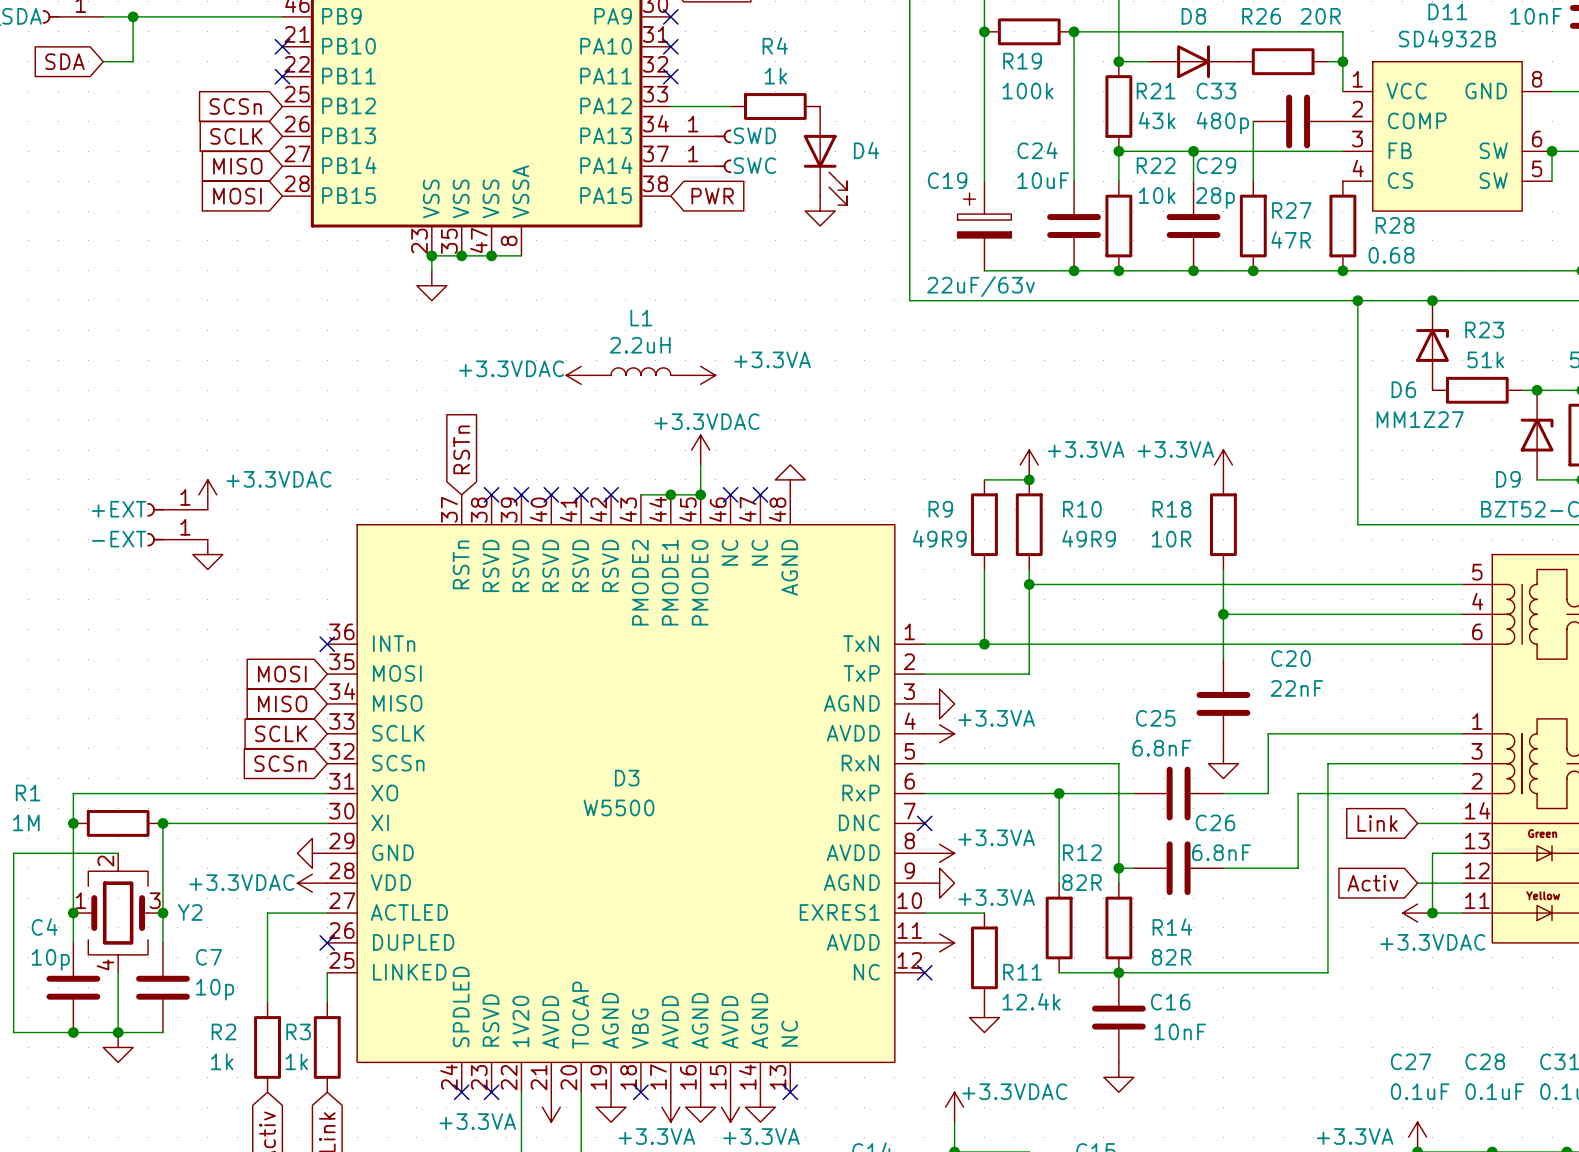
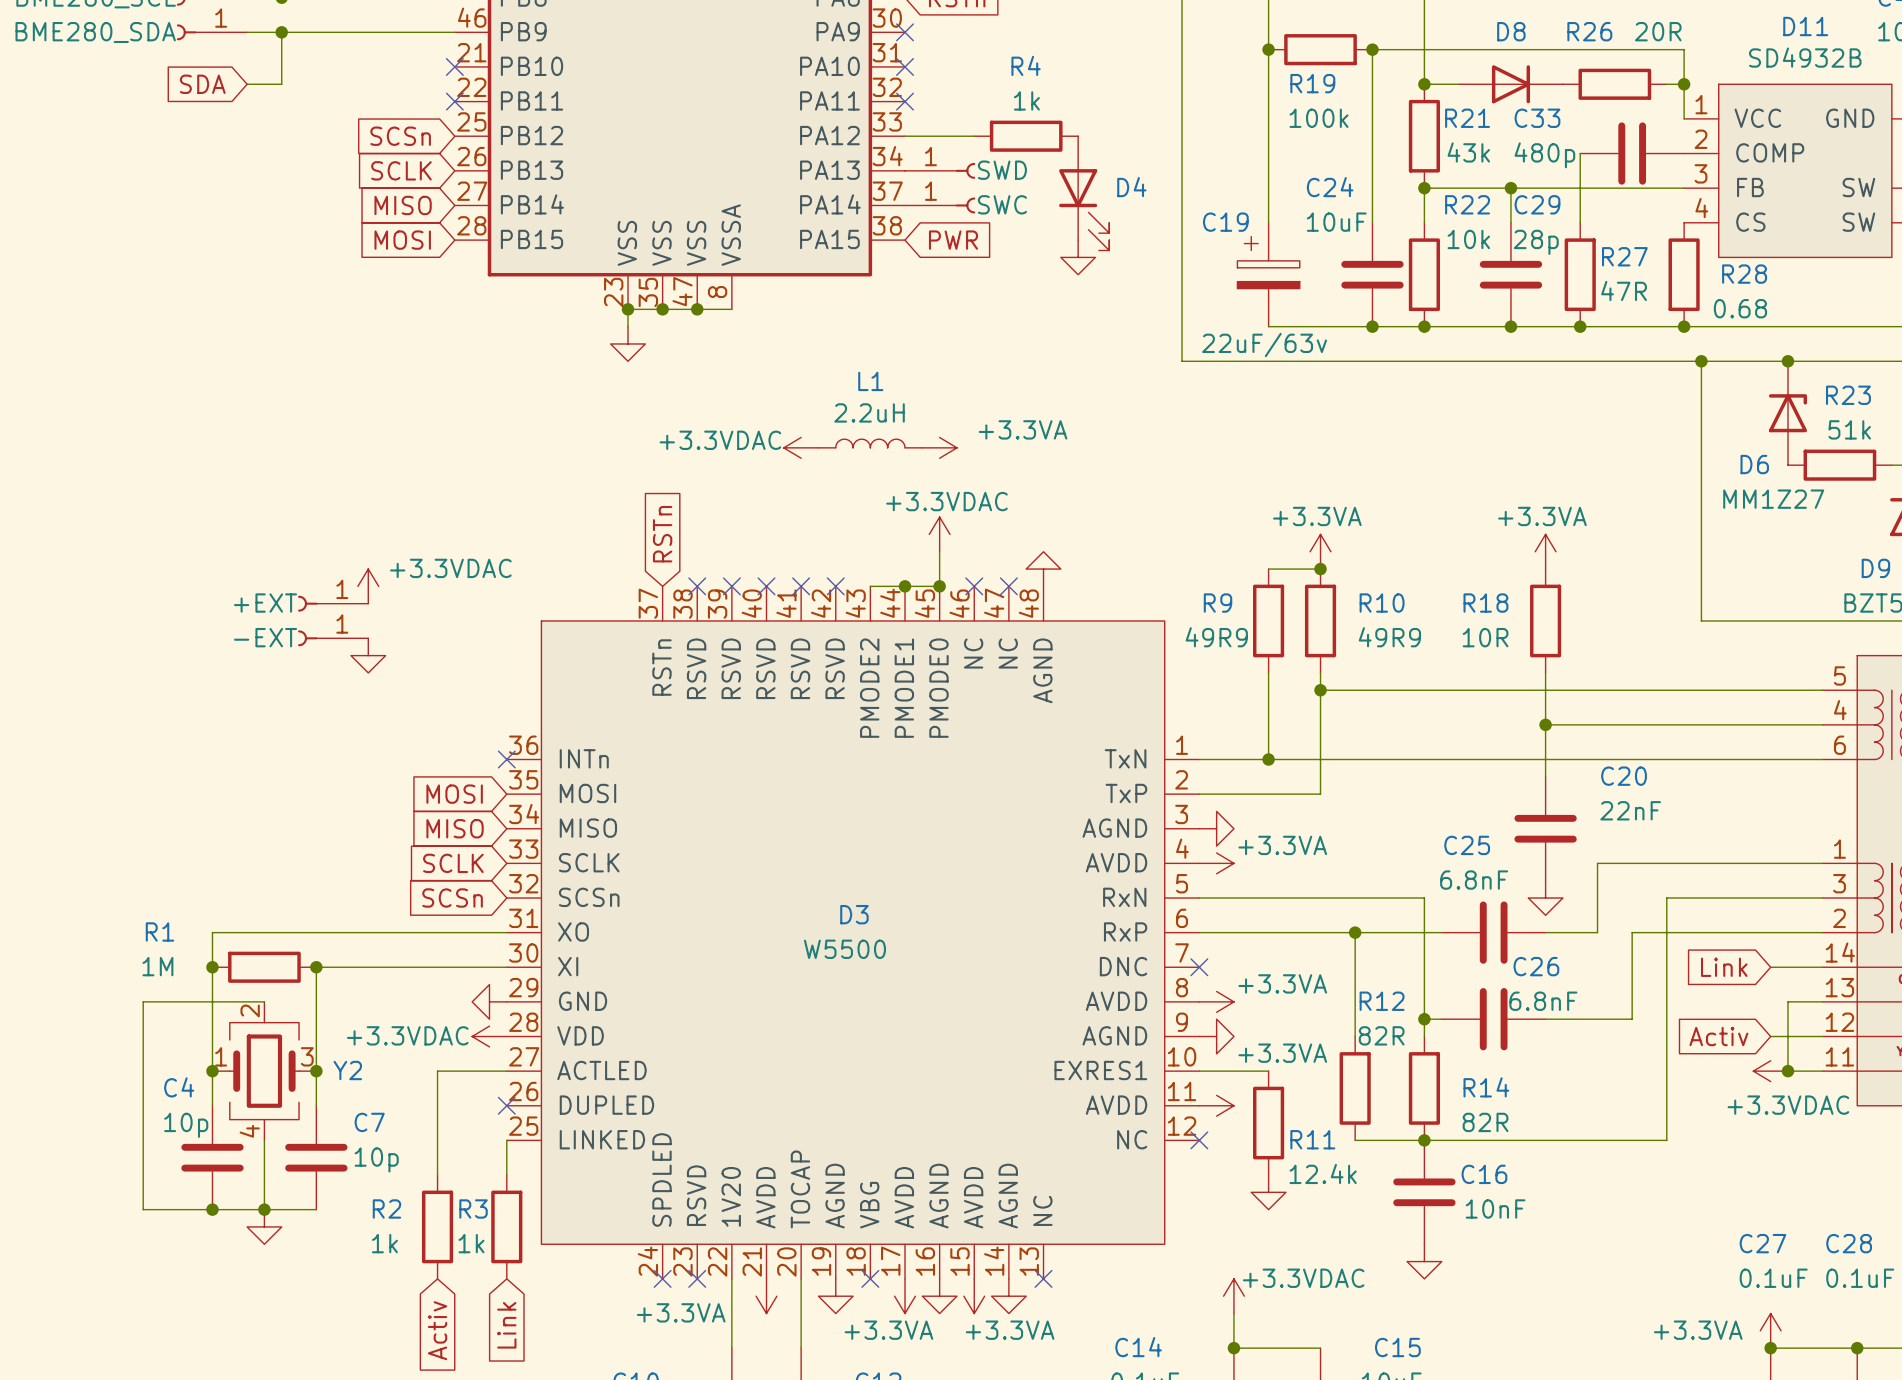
power symbol text position: +3.3VA (1086, 449) -> +3.3VA (1317, 516)
power symbol text position: +3.3VA (1175, 449) -> +3.3VA (1542, 516)

